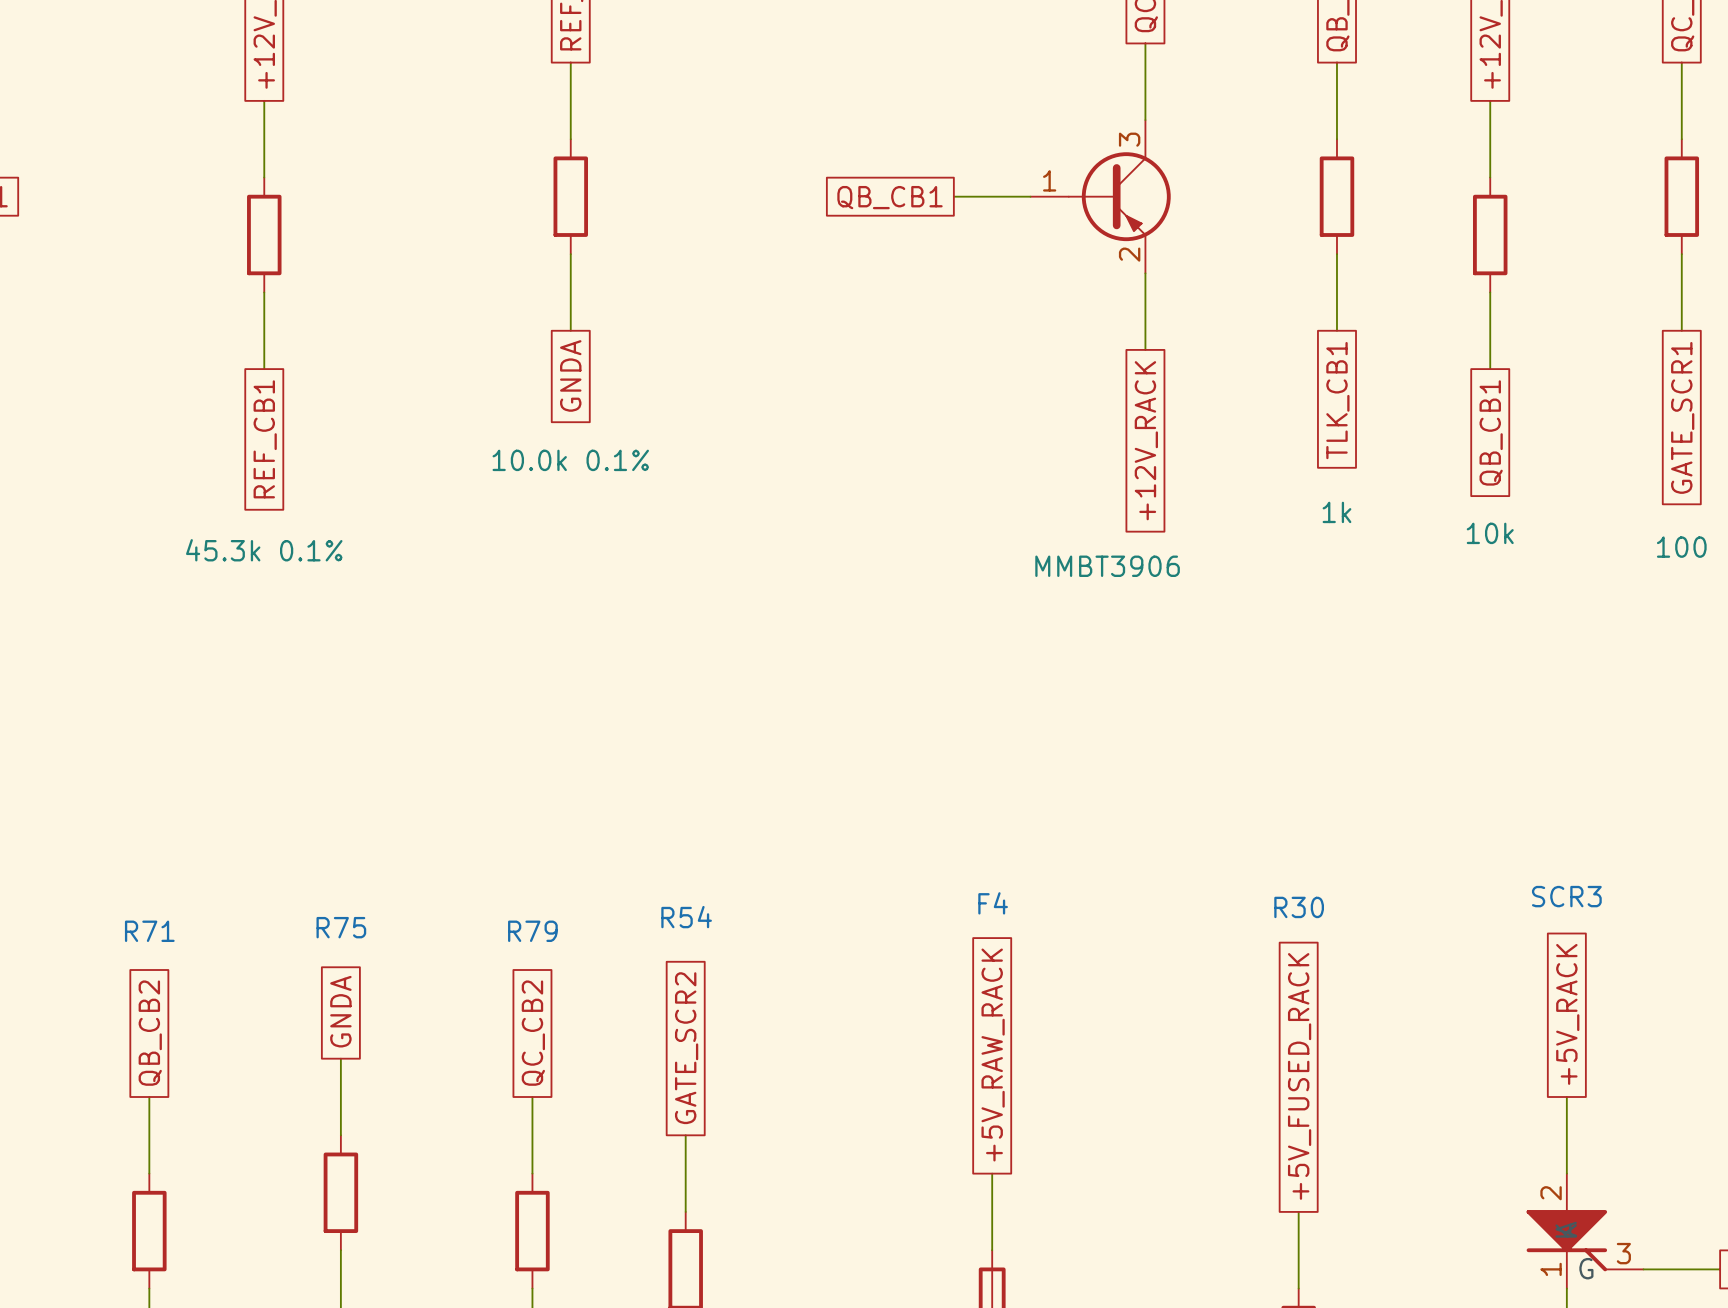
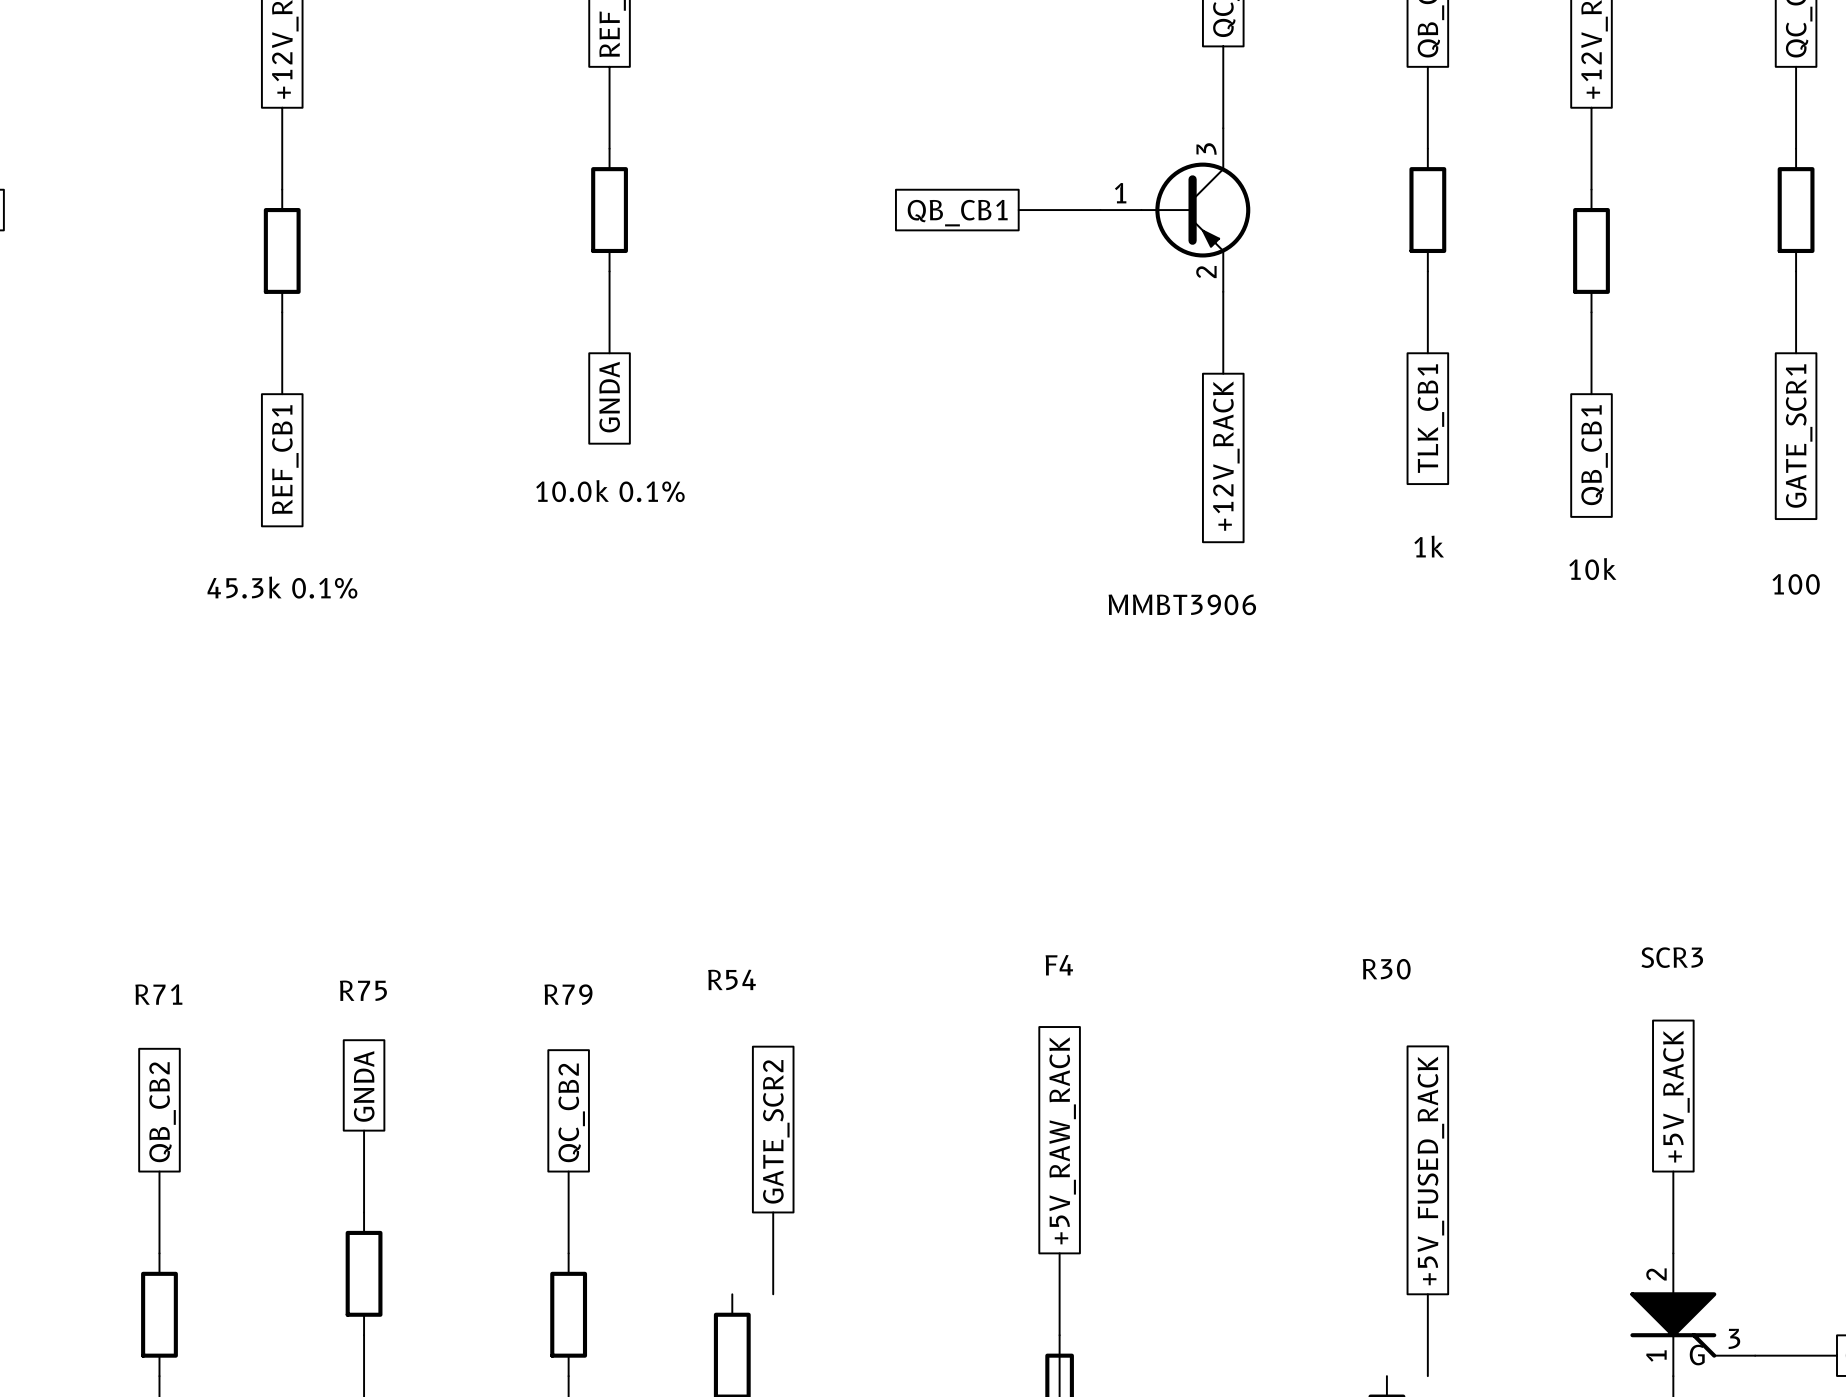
global label position: GATE_SCR2 (686, 1048) -> GATE_SCR2 (776, 1131)
global label position: +5V_FUSED_RACK (1299, 1076) -> +5V_FUSED_RACK (1430, 1170)
wire: (685, 1135) (685, 1211) -> (773, 1212) (773, 1294)
wire: (1298, 1211) (1298, 1288) -> (1427, 1294) (1427, 1376)

